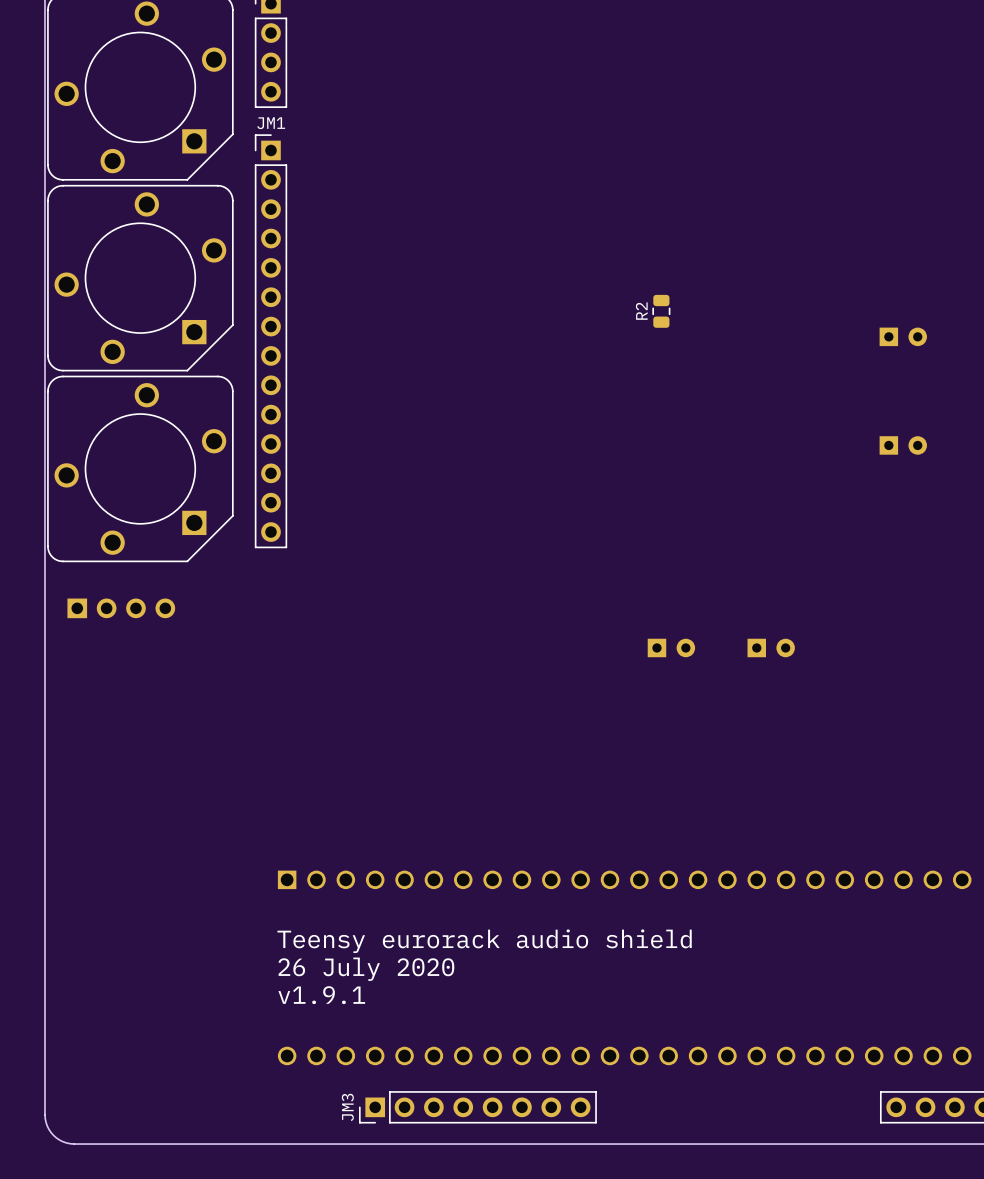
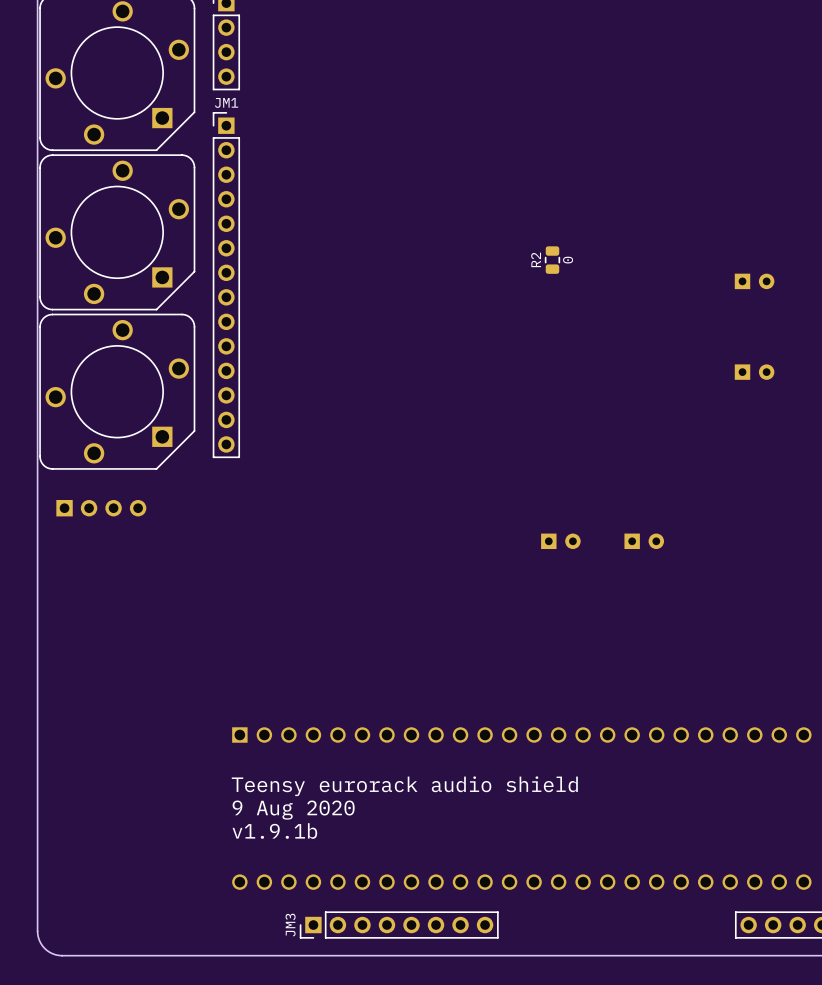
R2 value: none -> 0 (568, 260)
text: 26 July 2020 (366, 969) -> 9 Aug 2020 (293, 810)
text: v1.9.1 (321, 995) -> v1.9.1b (274, 831)

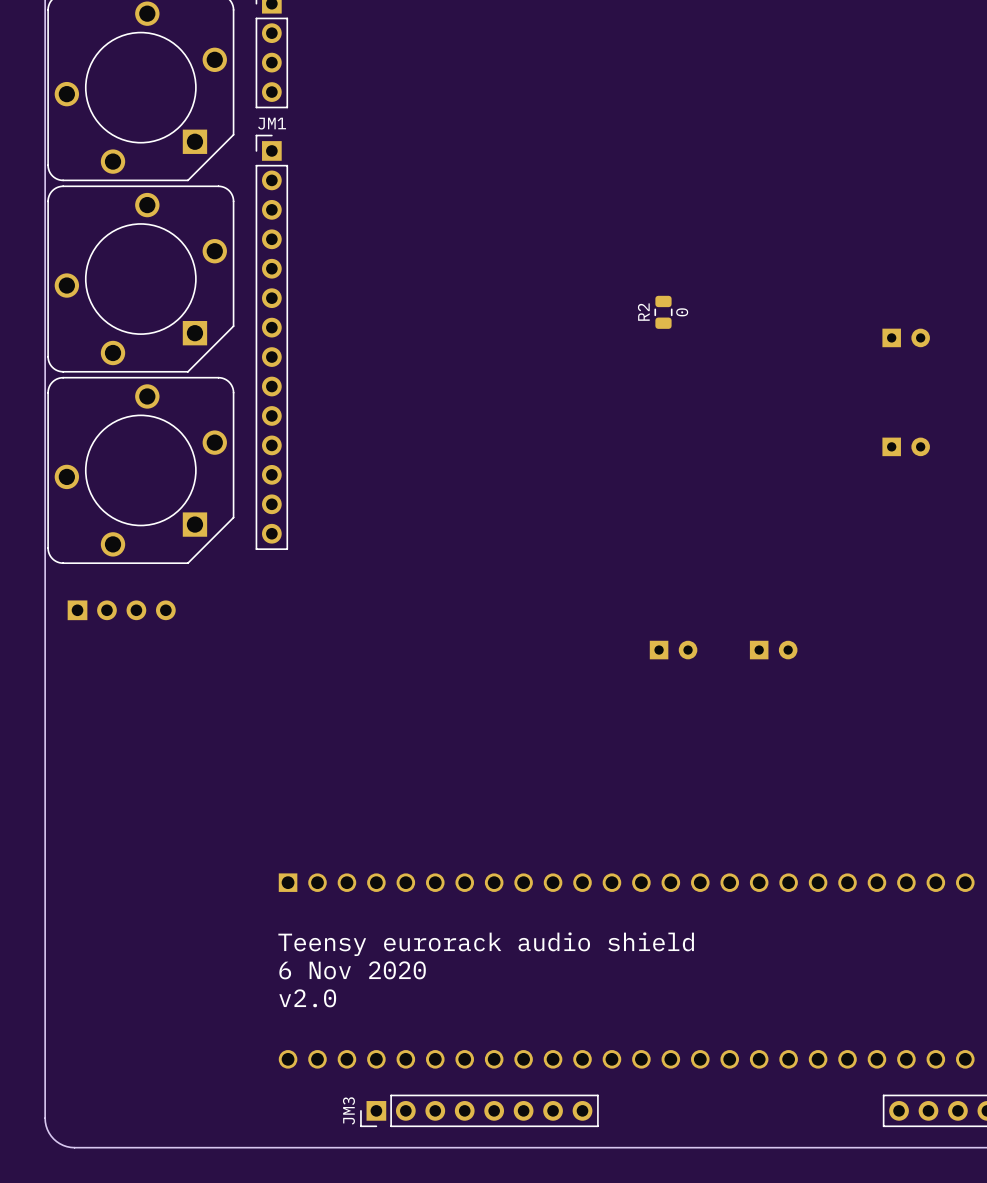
text: 9 Aug 2020 (293, 810) -> 6 Nov 2020 (352, 970)
text: v1.9.1b (274, 831) -> v2.0 (307, 998)

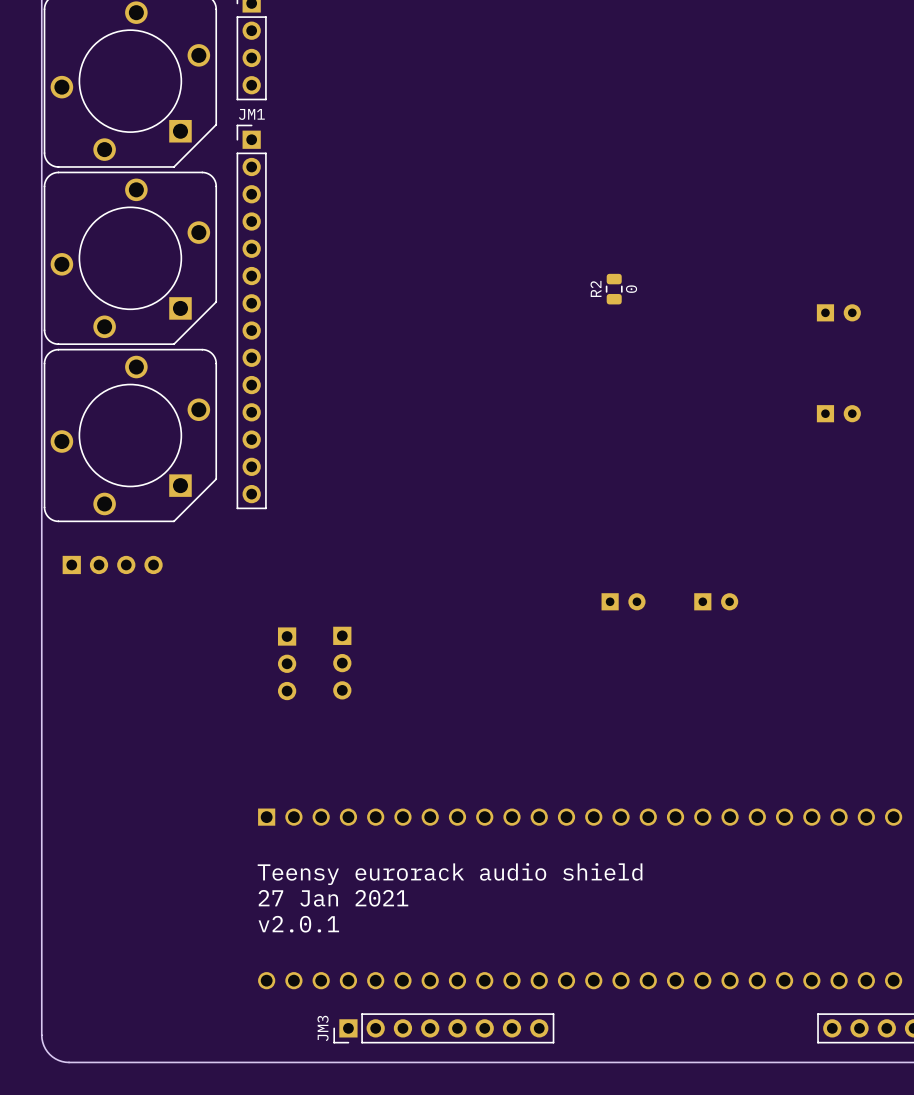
part: none -> (342, 663)
part: none -> (287, 663)
text: 6 Nov 2020 (352, 970) -> 27 Jan 2021 (333, 898)
text: v2.0 (307, 998) -> v2.0.1 (298, 924)

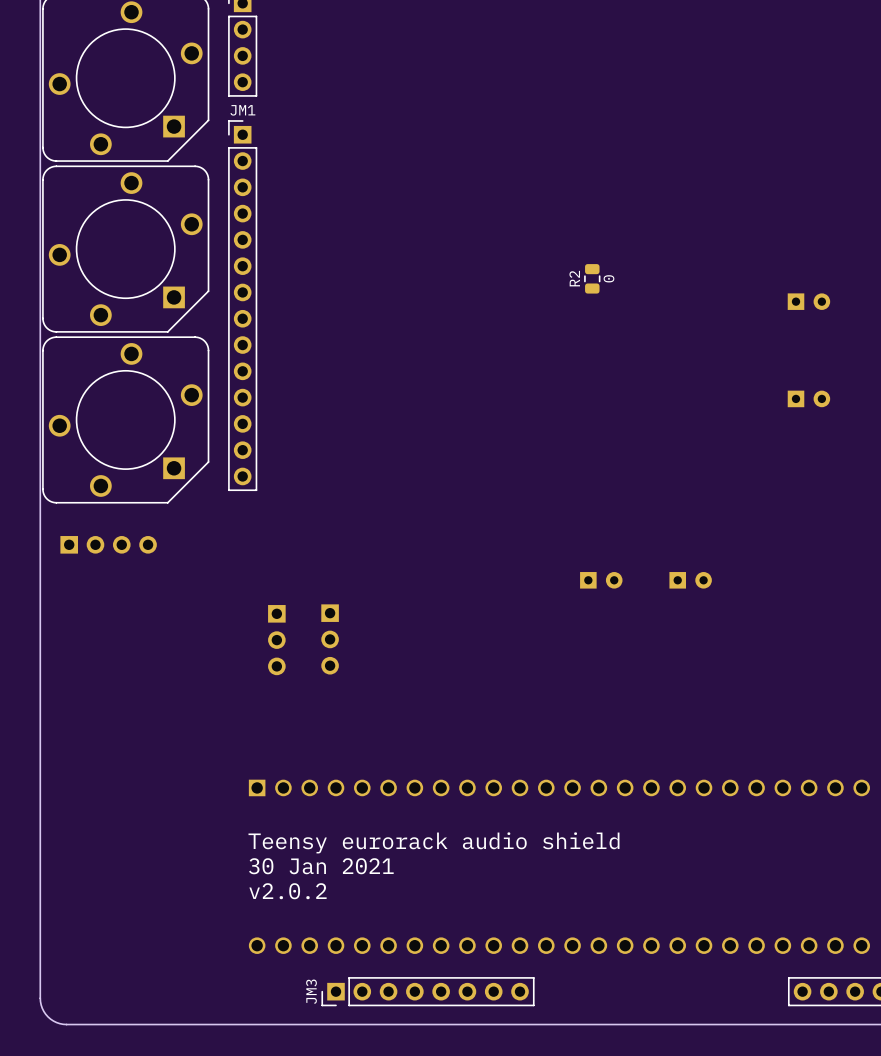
text: 27 Jan 2021 (333, 898) -> 30 Jan 2021 (321, 866)
text: v2.0.1 (298, 924) -> v2.0.2 (287, 891)

